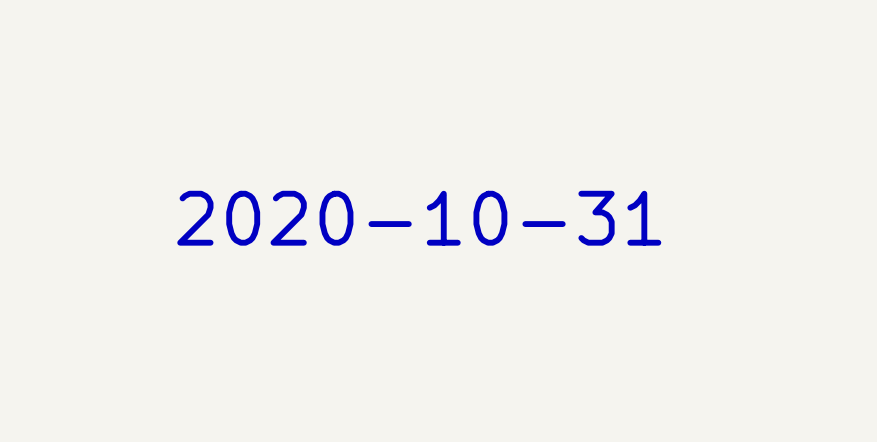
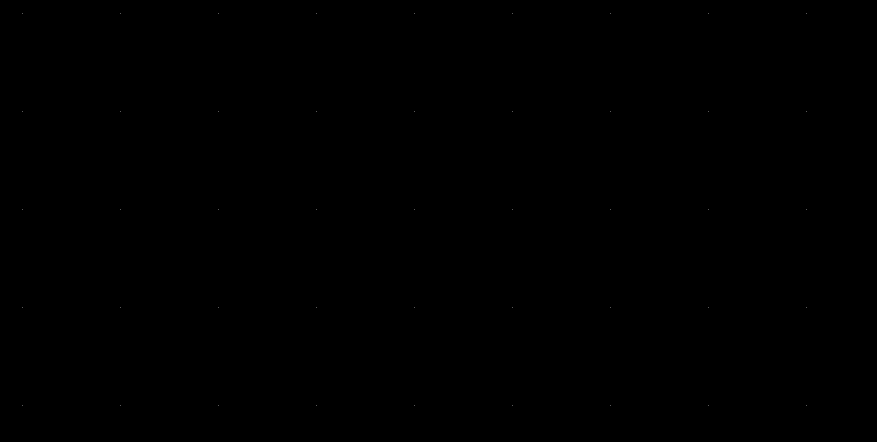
text: 2020-10-31 (419, 218) -> none

